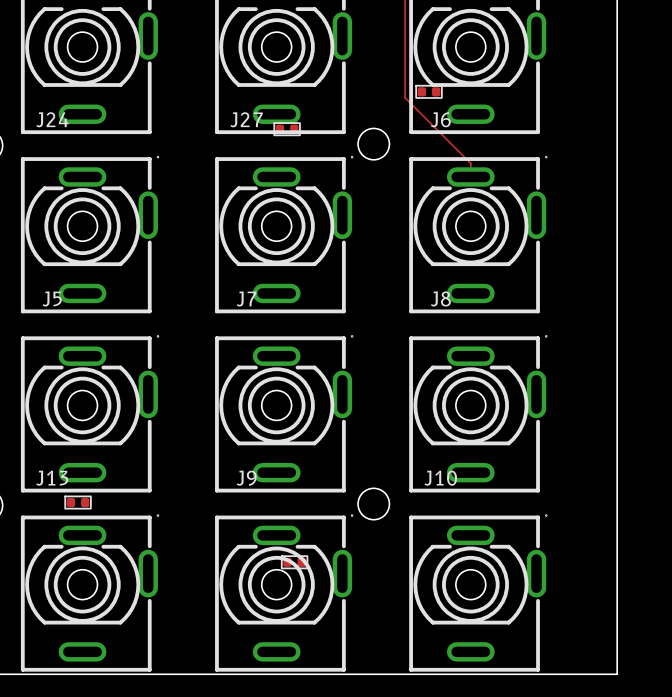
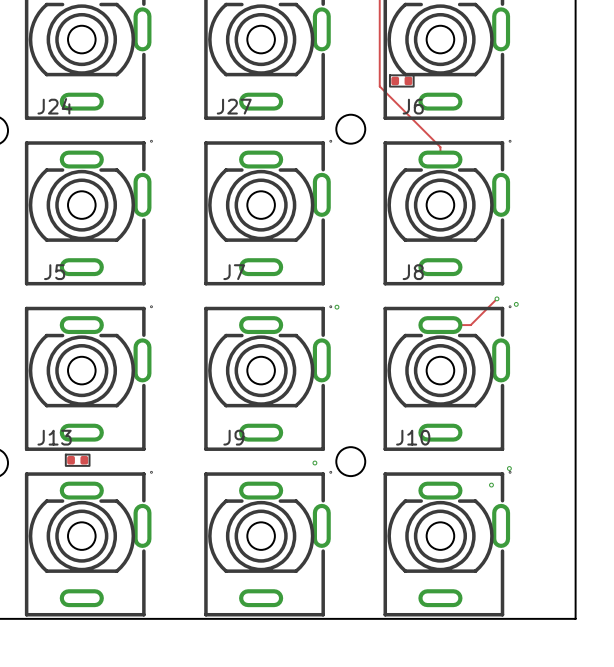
part: (287, 129) -> none
top track: none -> (496, 298) (470, 325) (440, 325)
via: none -> (496, 298)
via: none -> (516, 304)
via: none -> (336, 307)
via: none -> (314, 463)
via: none -> (509, 468)
via: none -> (491, 485)
part: (294, 562) -> none

